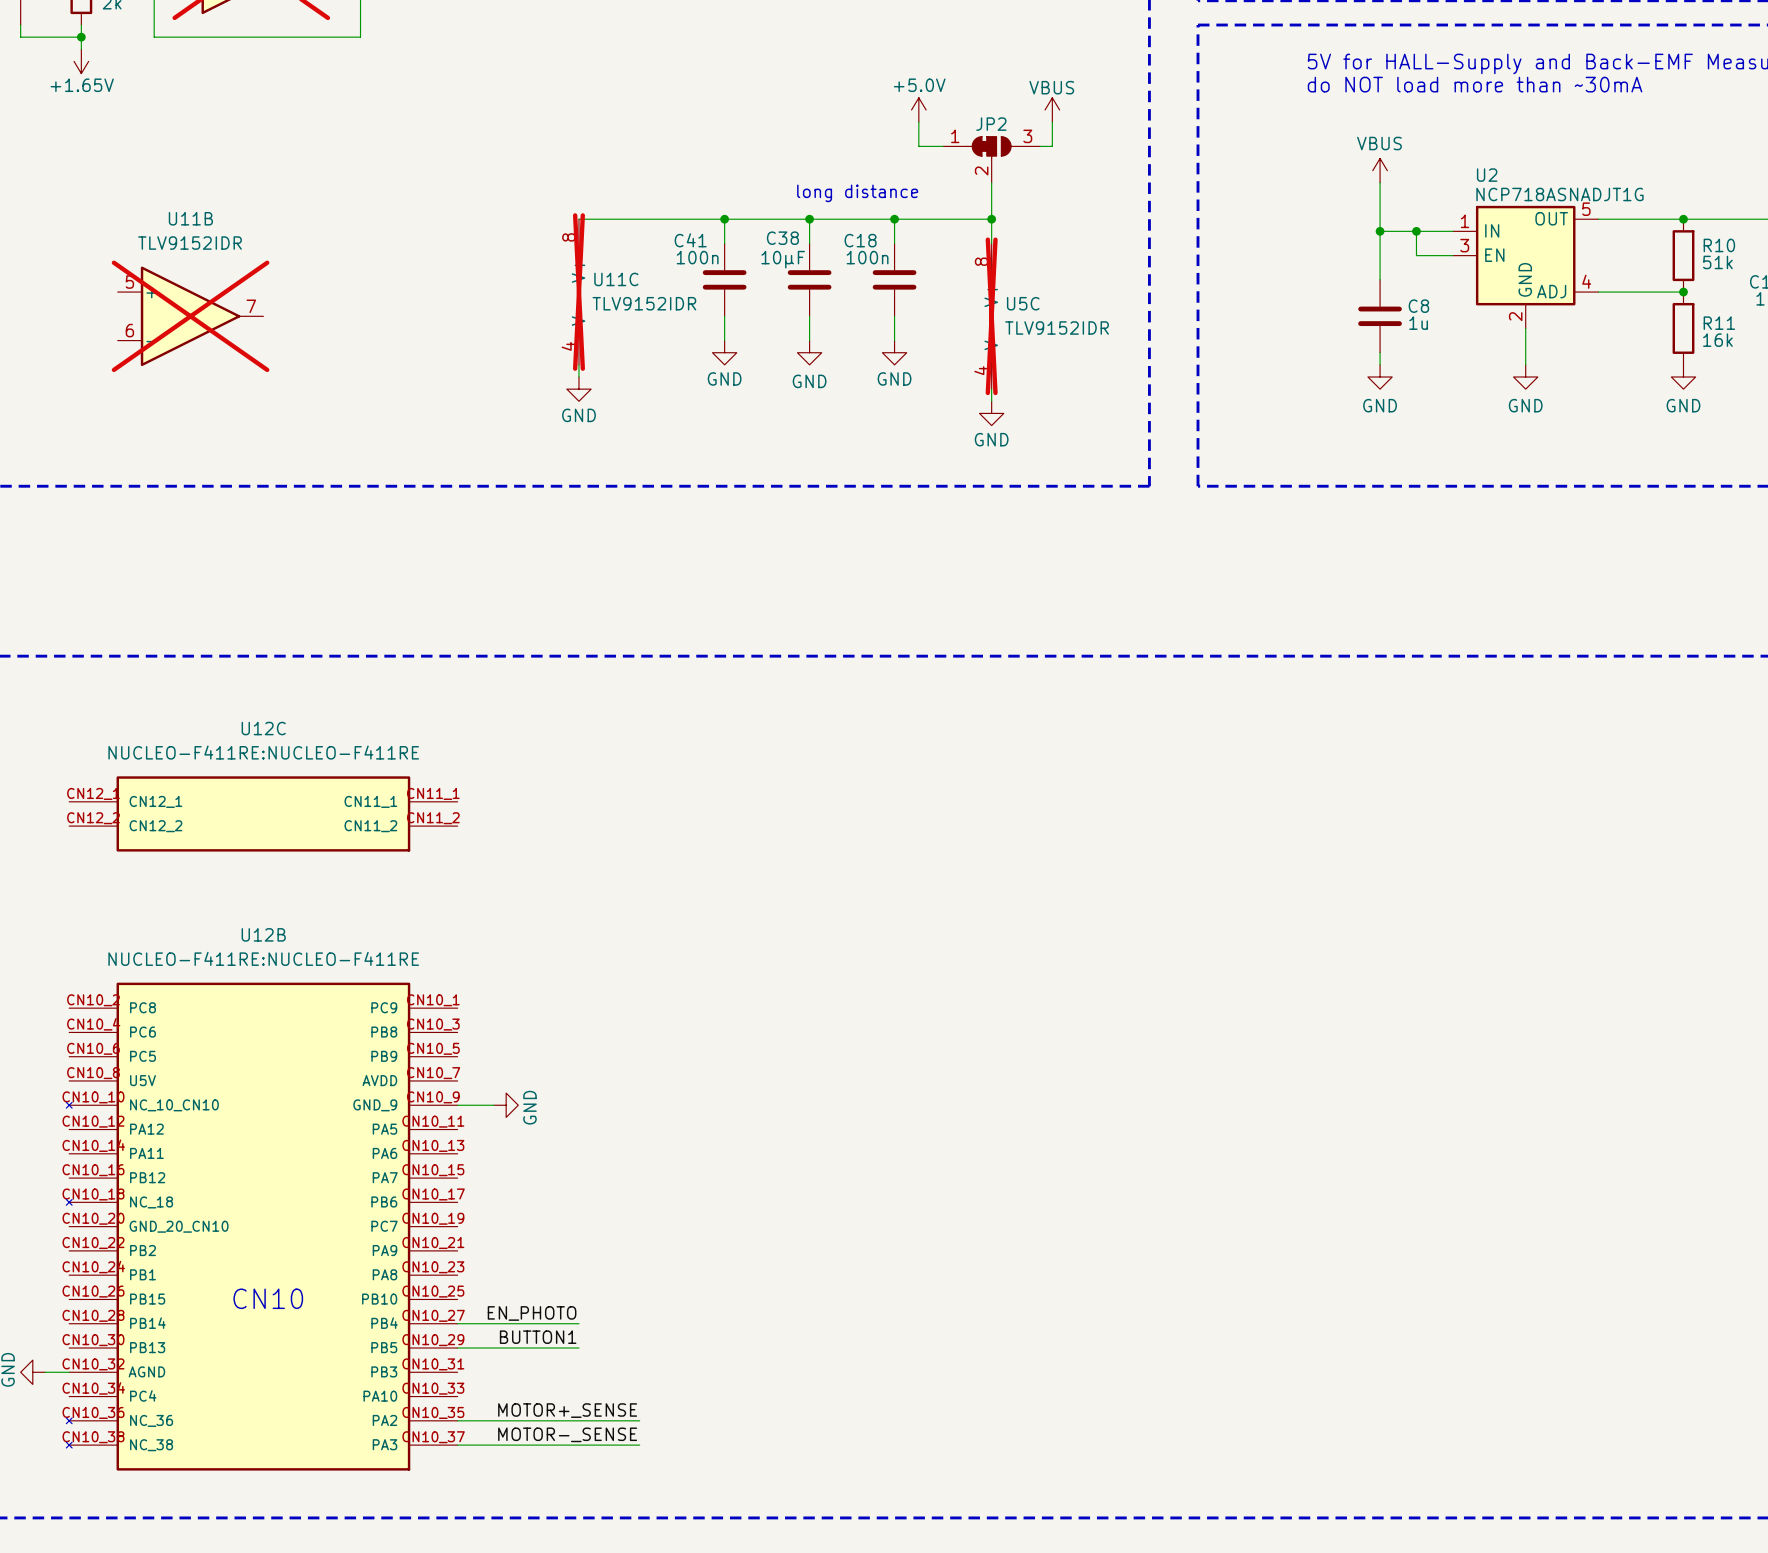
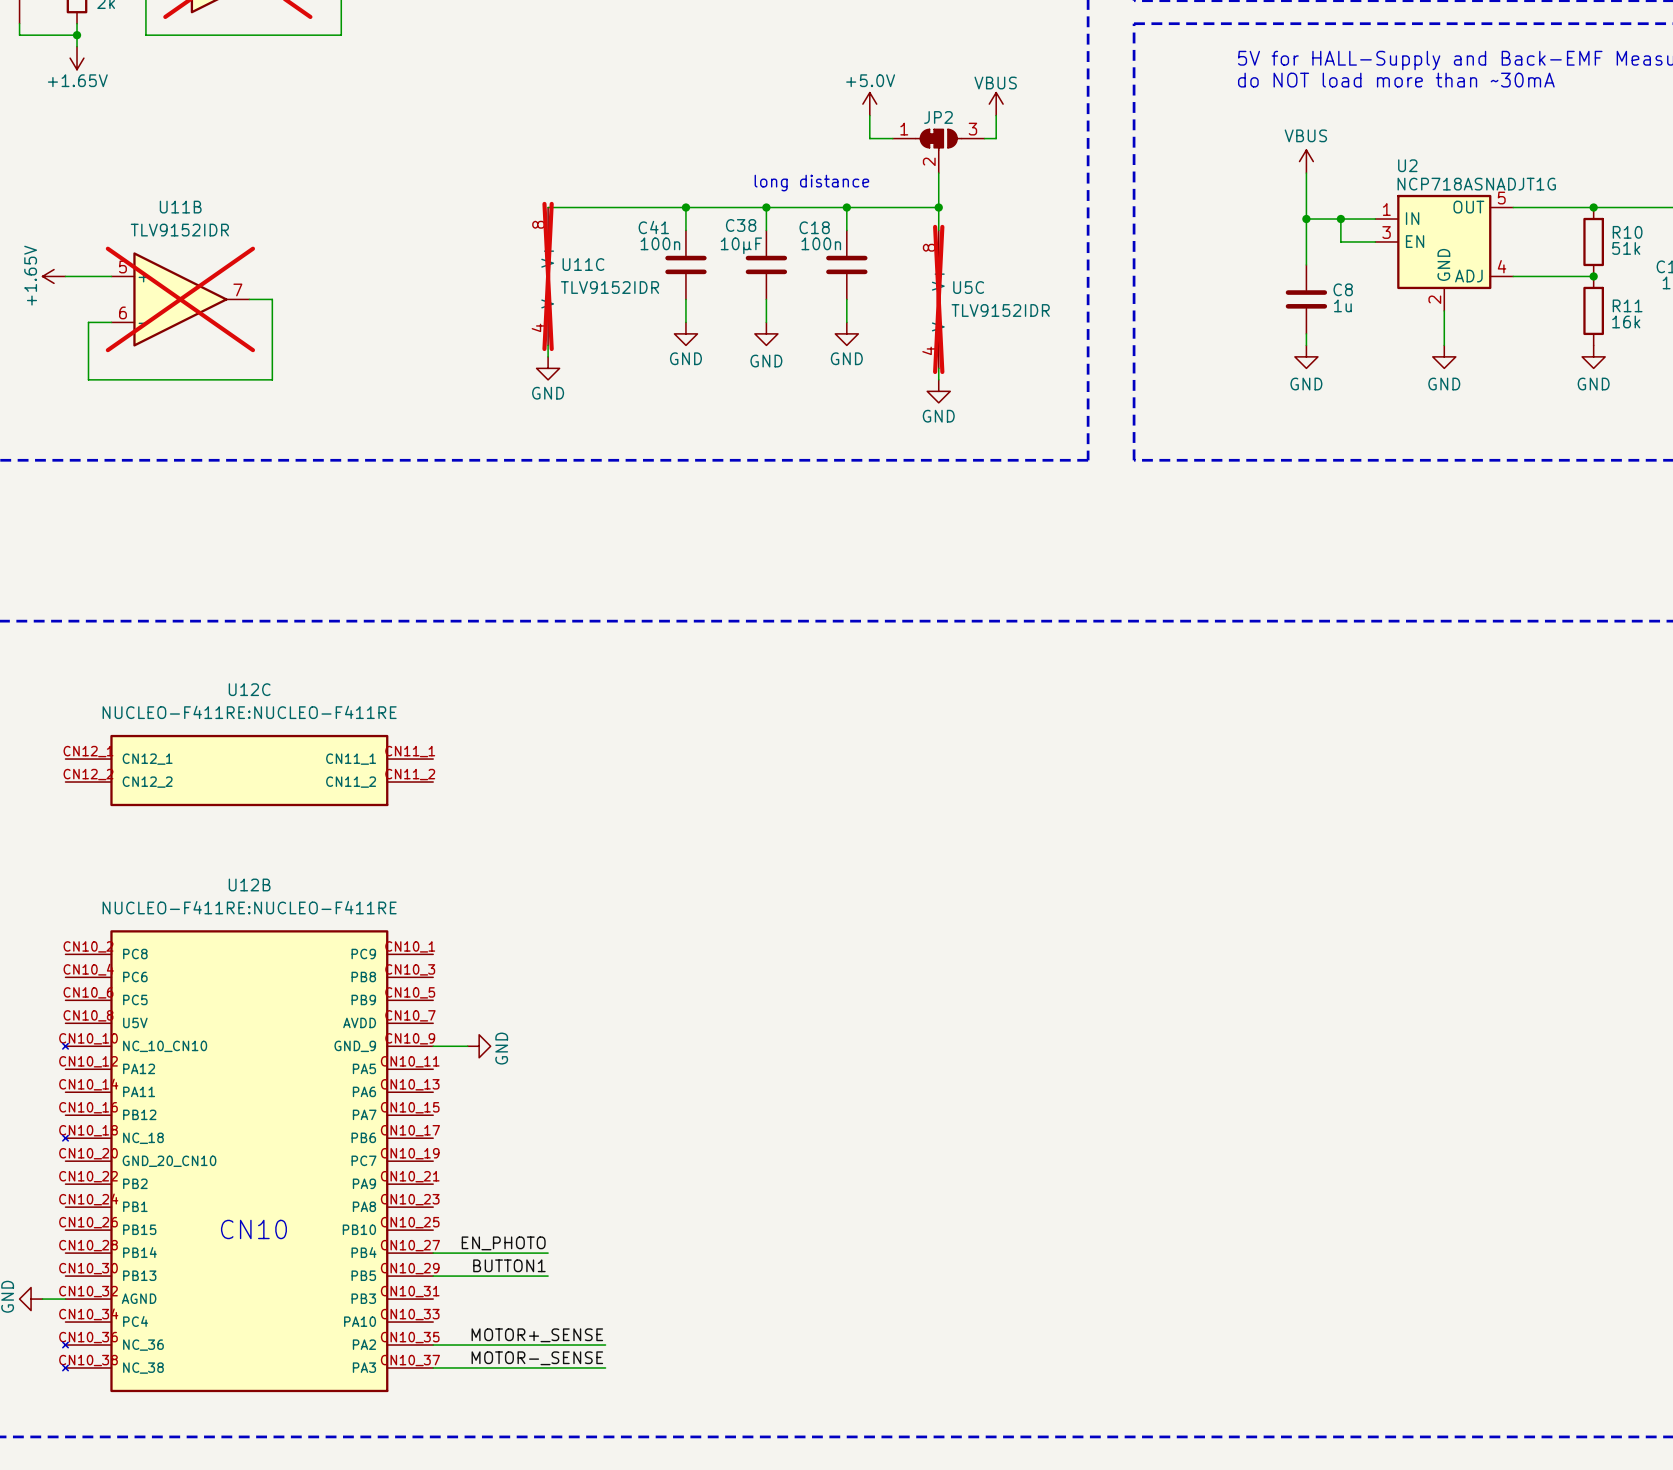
power symbol: none -> +1.65V (54, 276)
wire: none -> (65, 276) (111, 276)
wire: none -> (249, 299) (272, 299) (272, 379) (88, 379) (88, 322) (111, 322)

